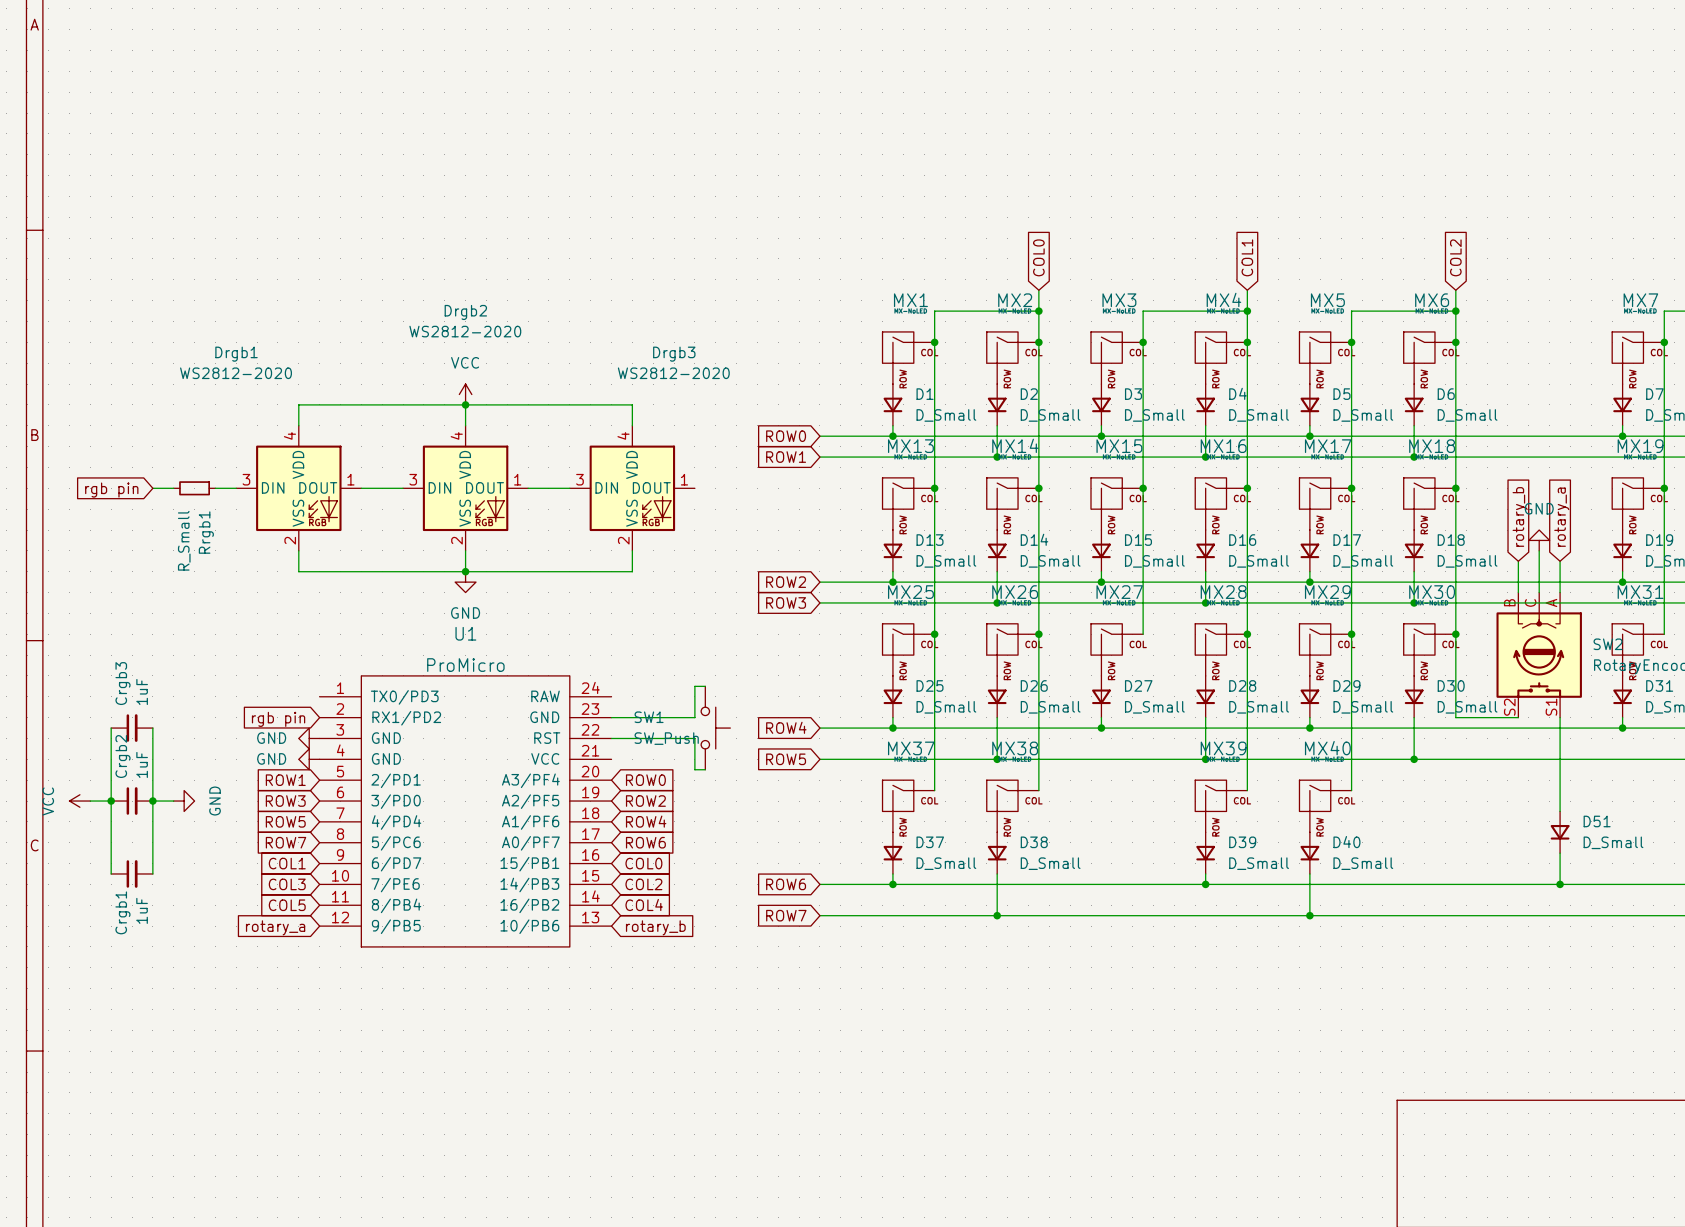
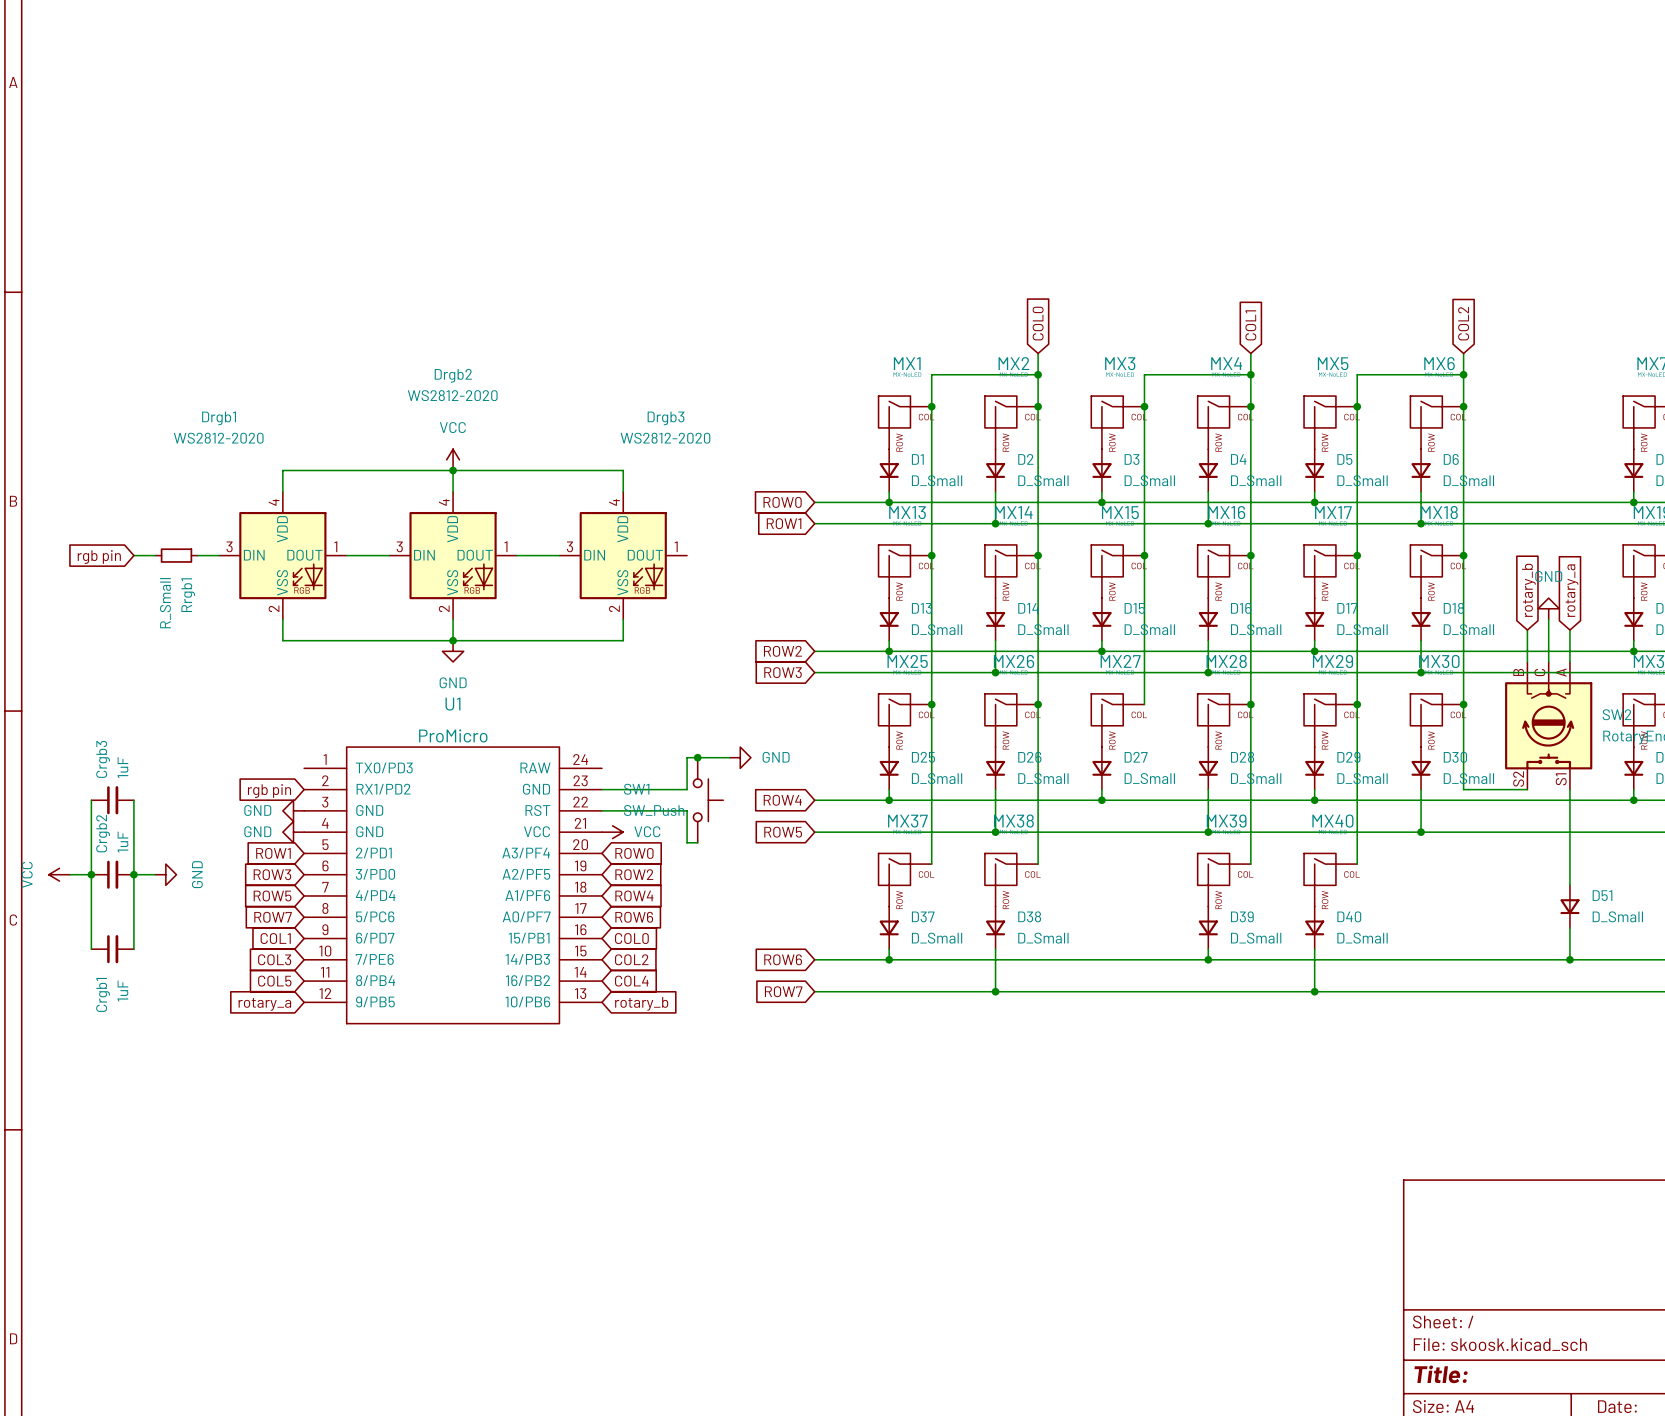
wire: none -> (697, 757) (729, 757)
junction: none -> (697, 757)
power symbol: none -> GND (740, 757)
power symbol: none -> VCC (612, 832)

